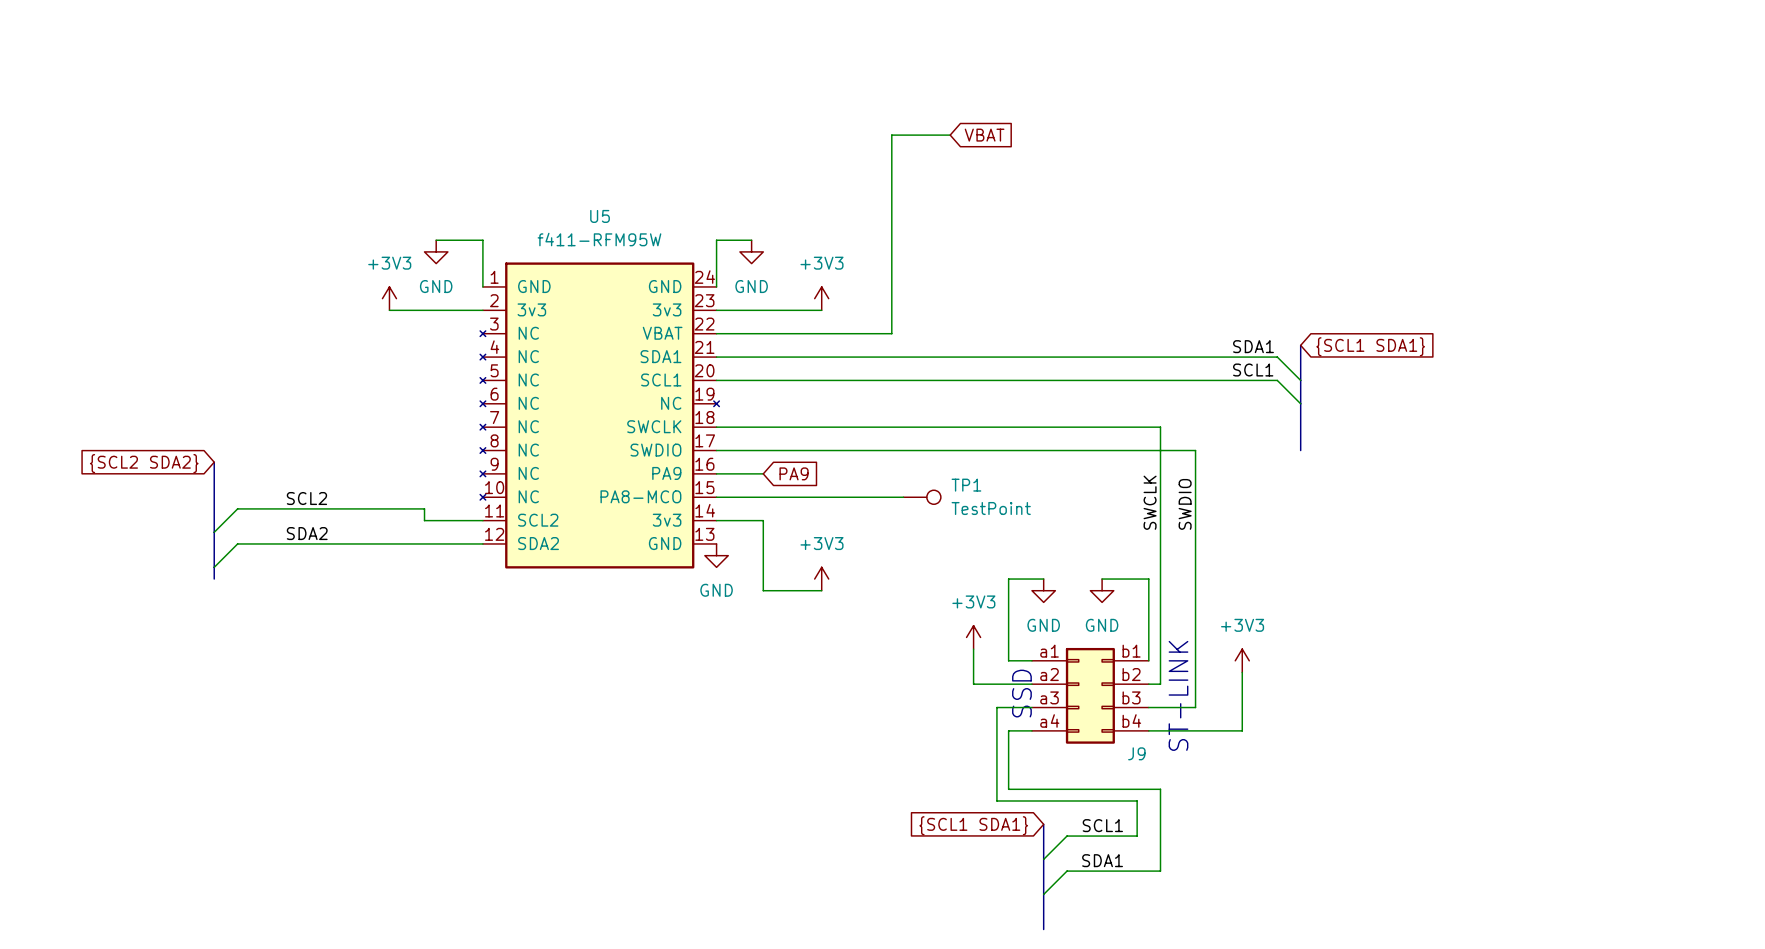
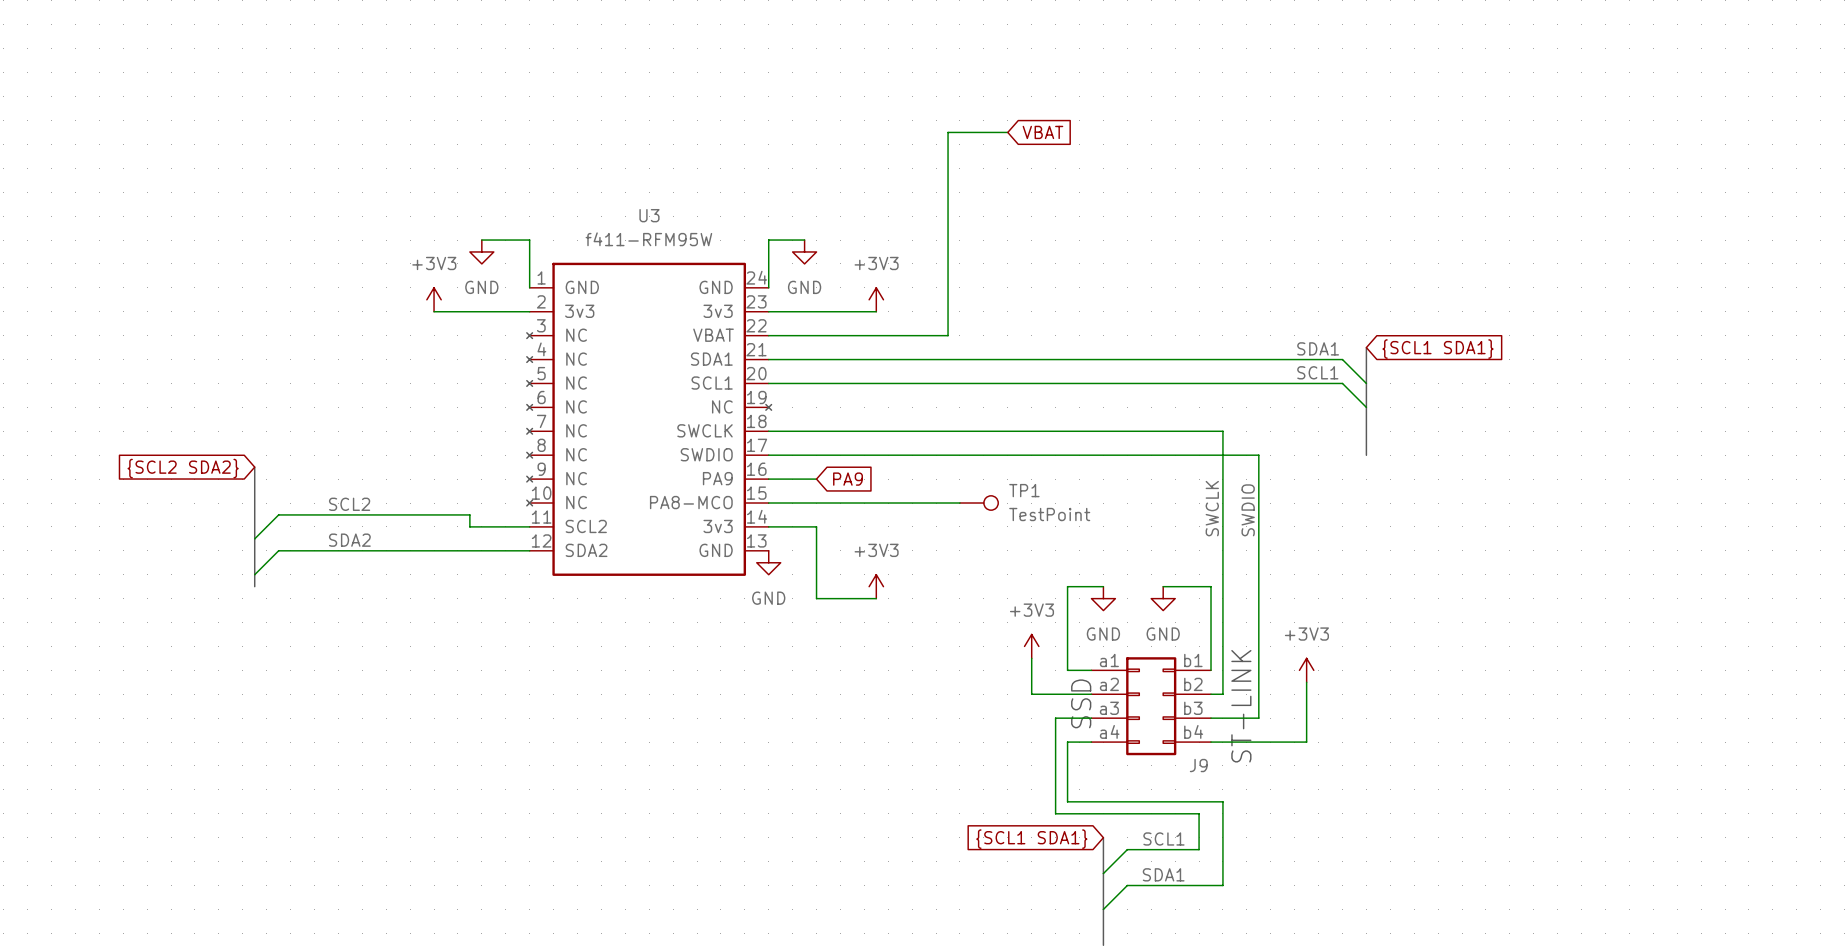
U5 name: U5 (600, 216) -> U3 (649, 215)

